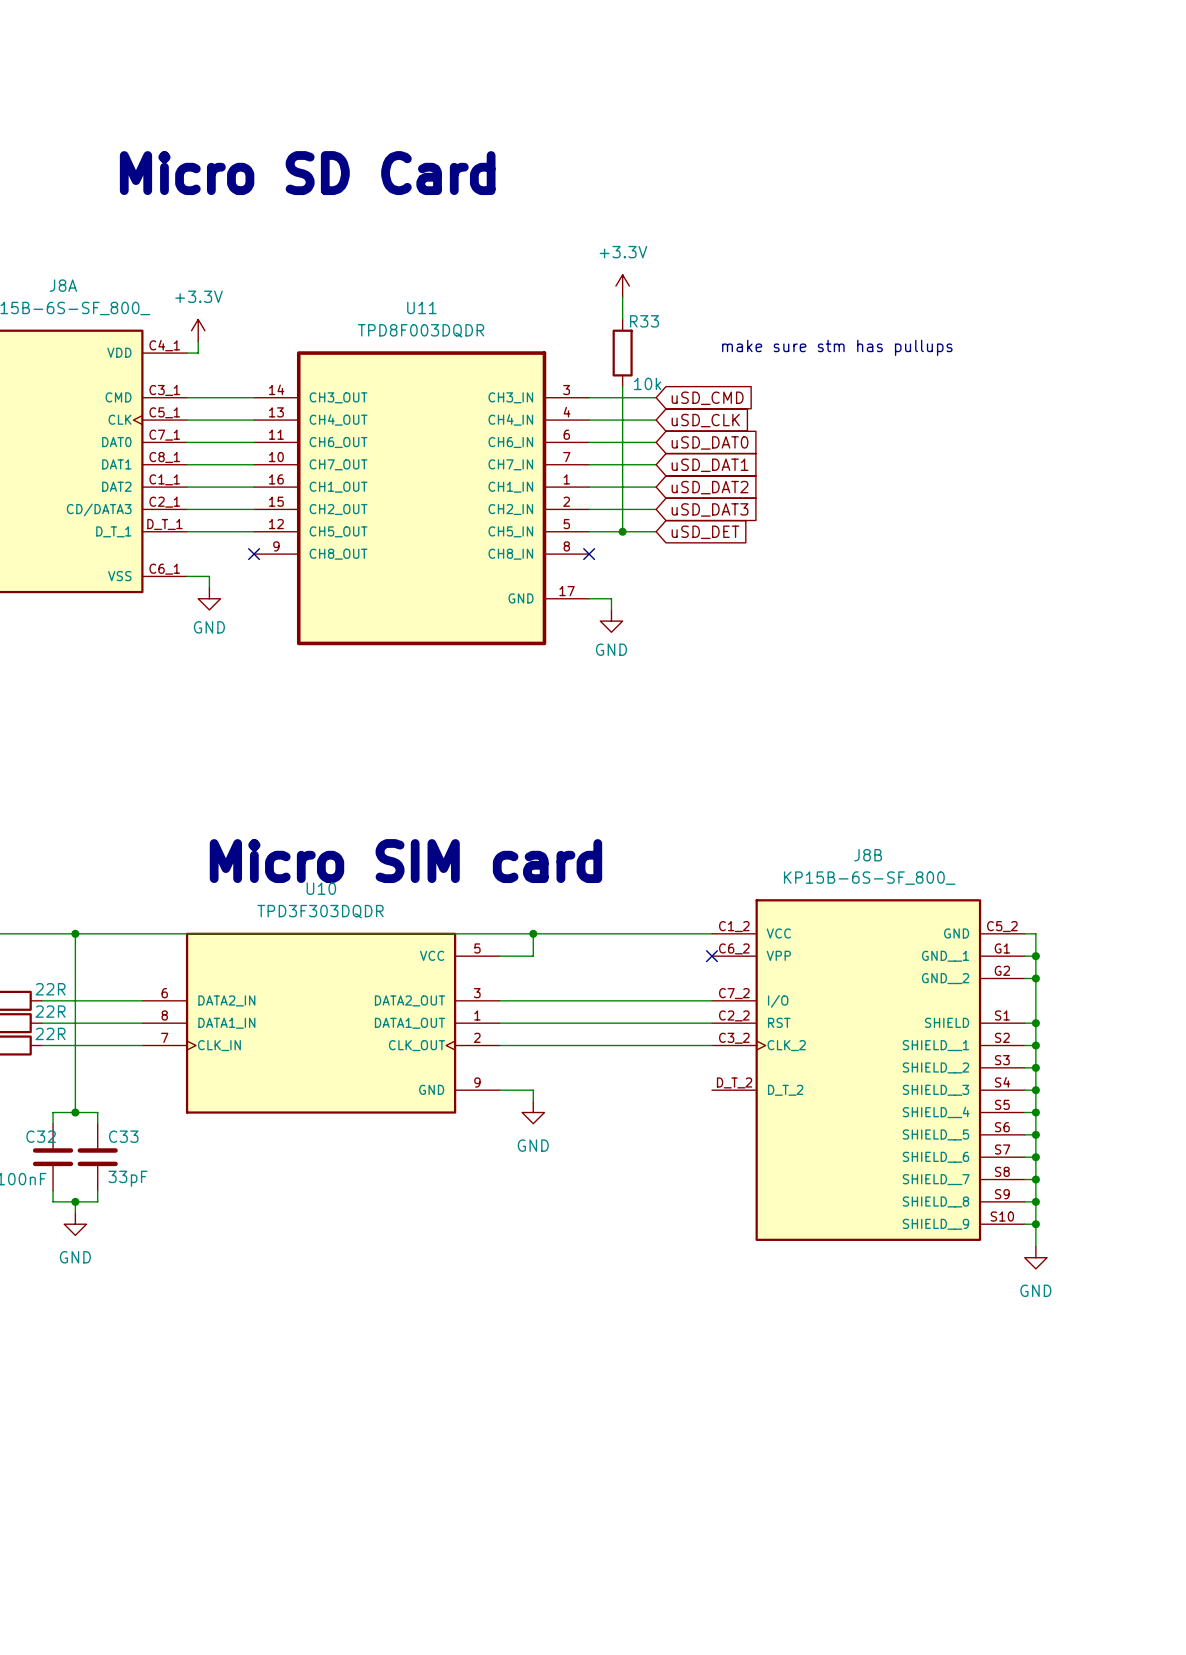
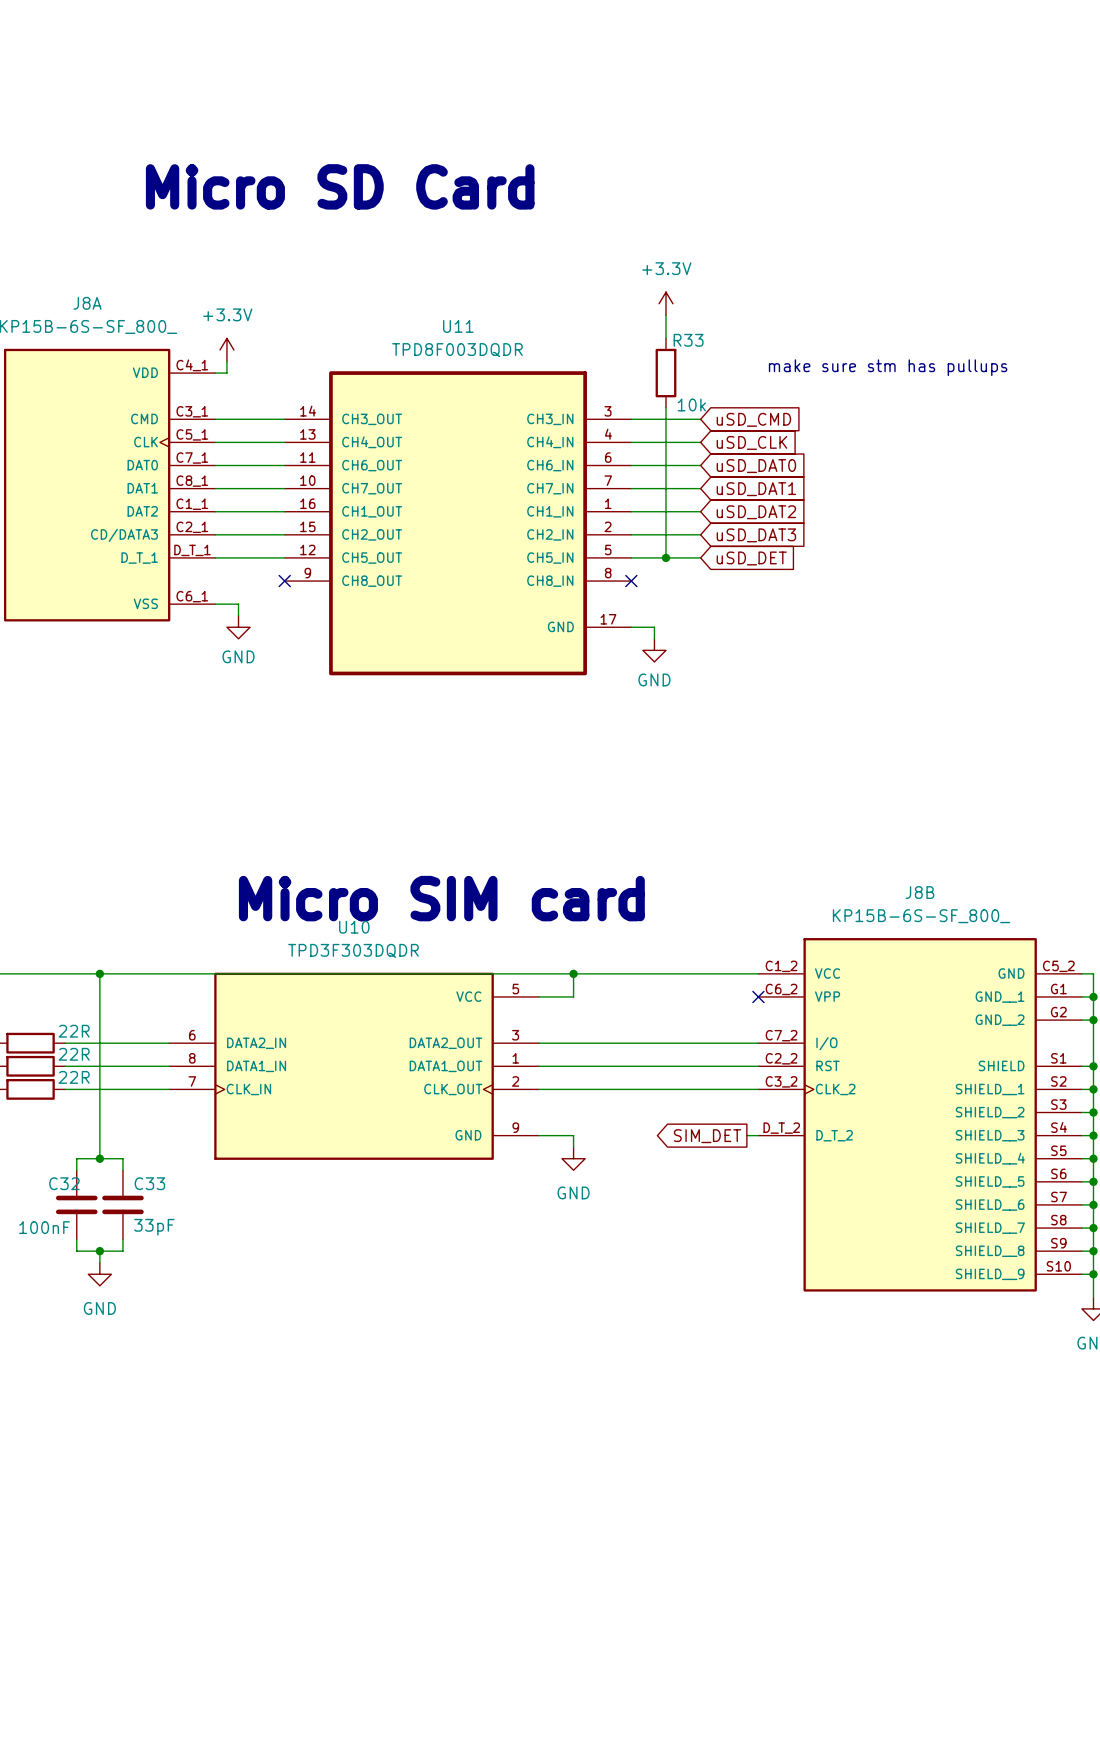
global label: none -> SIM_DET (707, 1136)
wire: none -> (746, 1135) (758, 1135)

